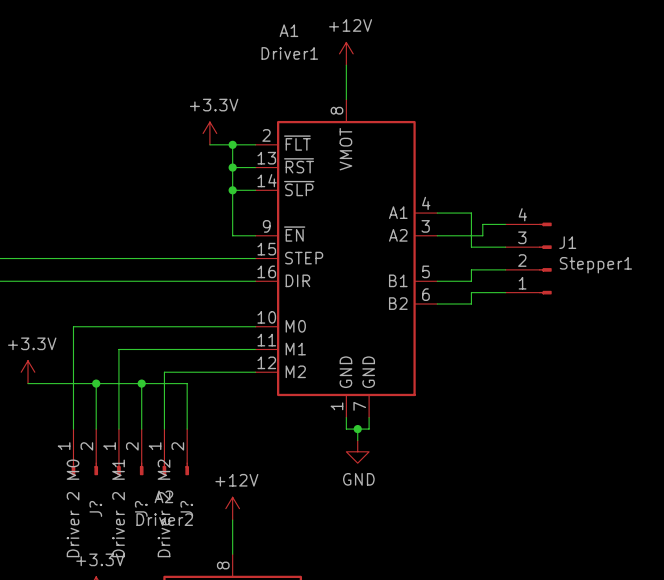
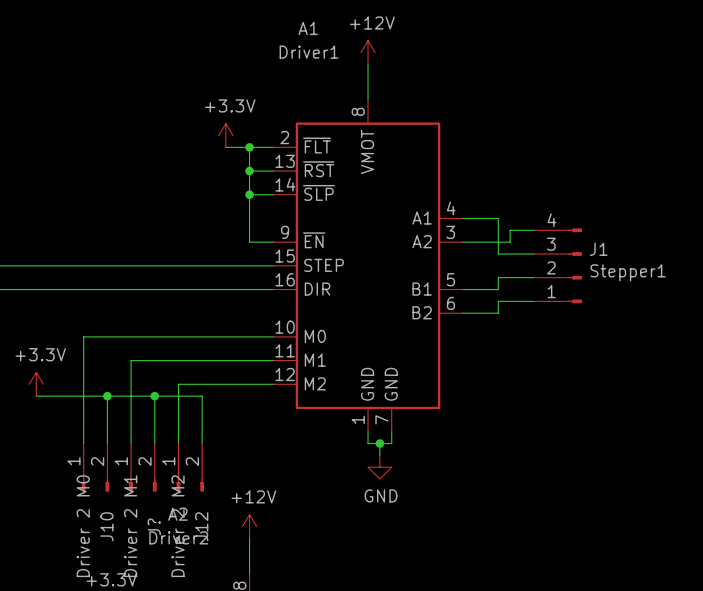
J? name: J? (95, 508) -> J10 (106, 526)
J? name: J? (186, 508) -> J12 (201, 526)

